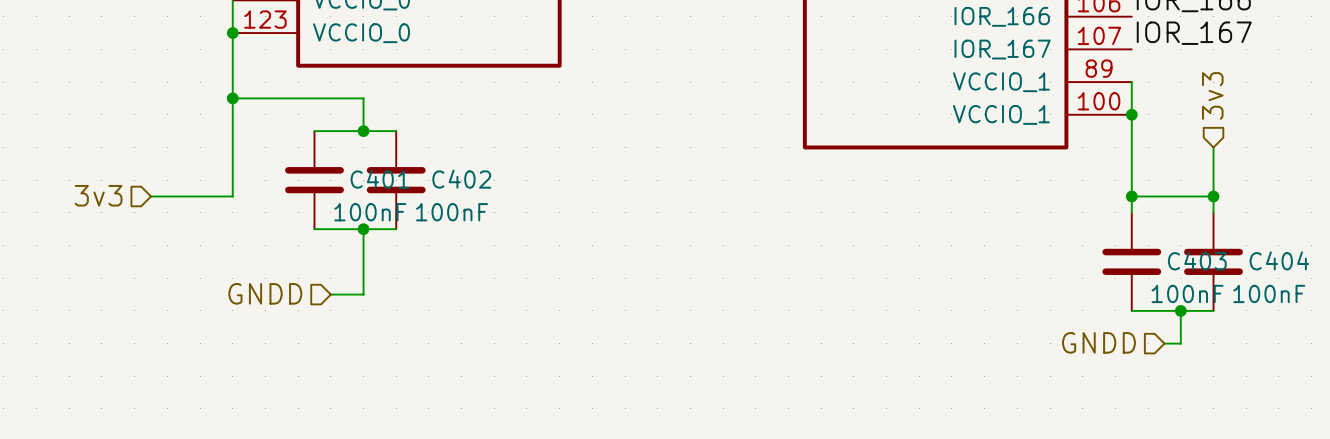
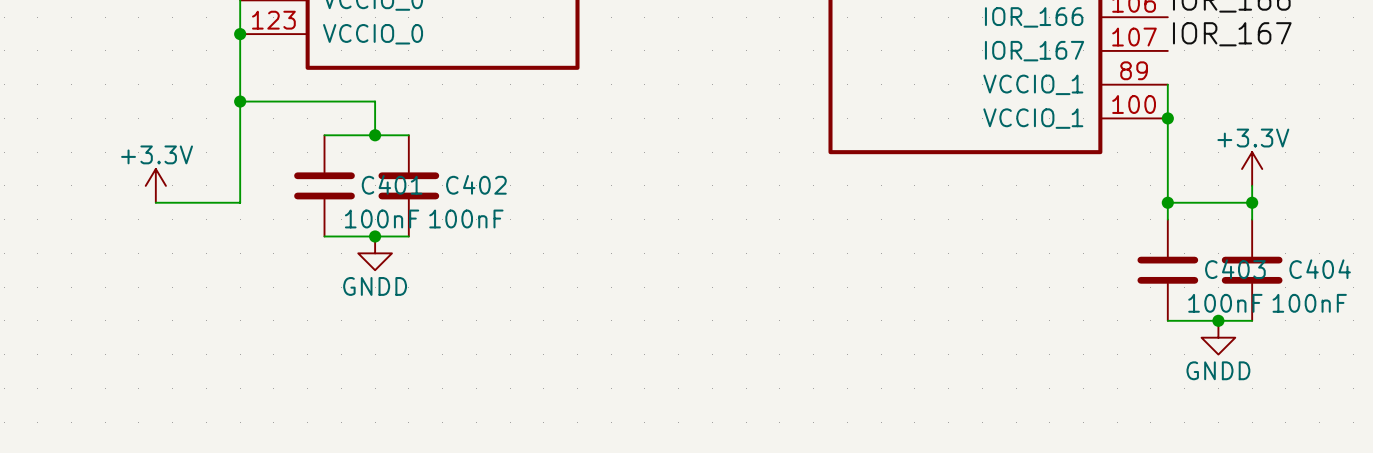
hierarchical label: 3v3 (1212, 95) -> none
power symbol: none -> +3.3V (1252, 169)
power symbol: none -> +3.3V (155, 185)
hierarchical label: 3v3 (98, 195) -> none
wire: (363, 229) (363, 294) (330, 294) -> none
power symbol: none -> GNDD (375, 253)
hierarchical label: GNDD (265, 293) -> none
wire: (1180, 310) (1180, 343) (1164, 343) -> none
power symbol: none -> GNDD (1218, 337)
hierarchical label: GNDD (1098, 342) -> none

